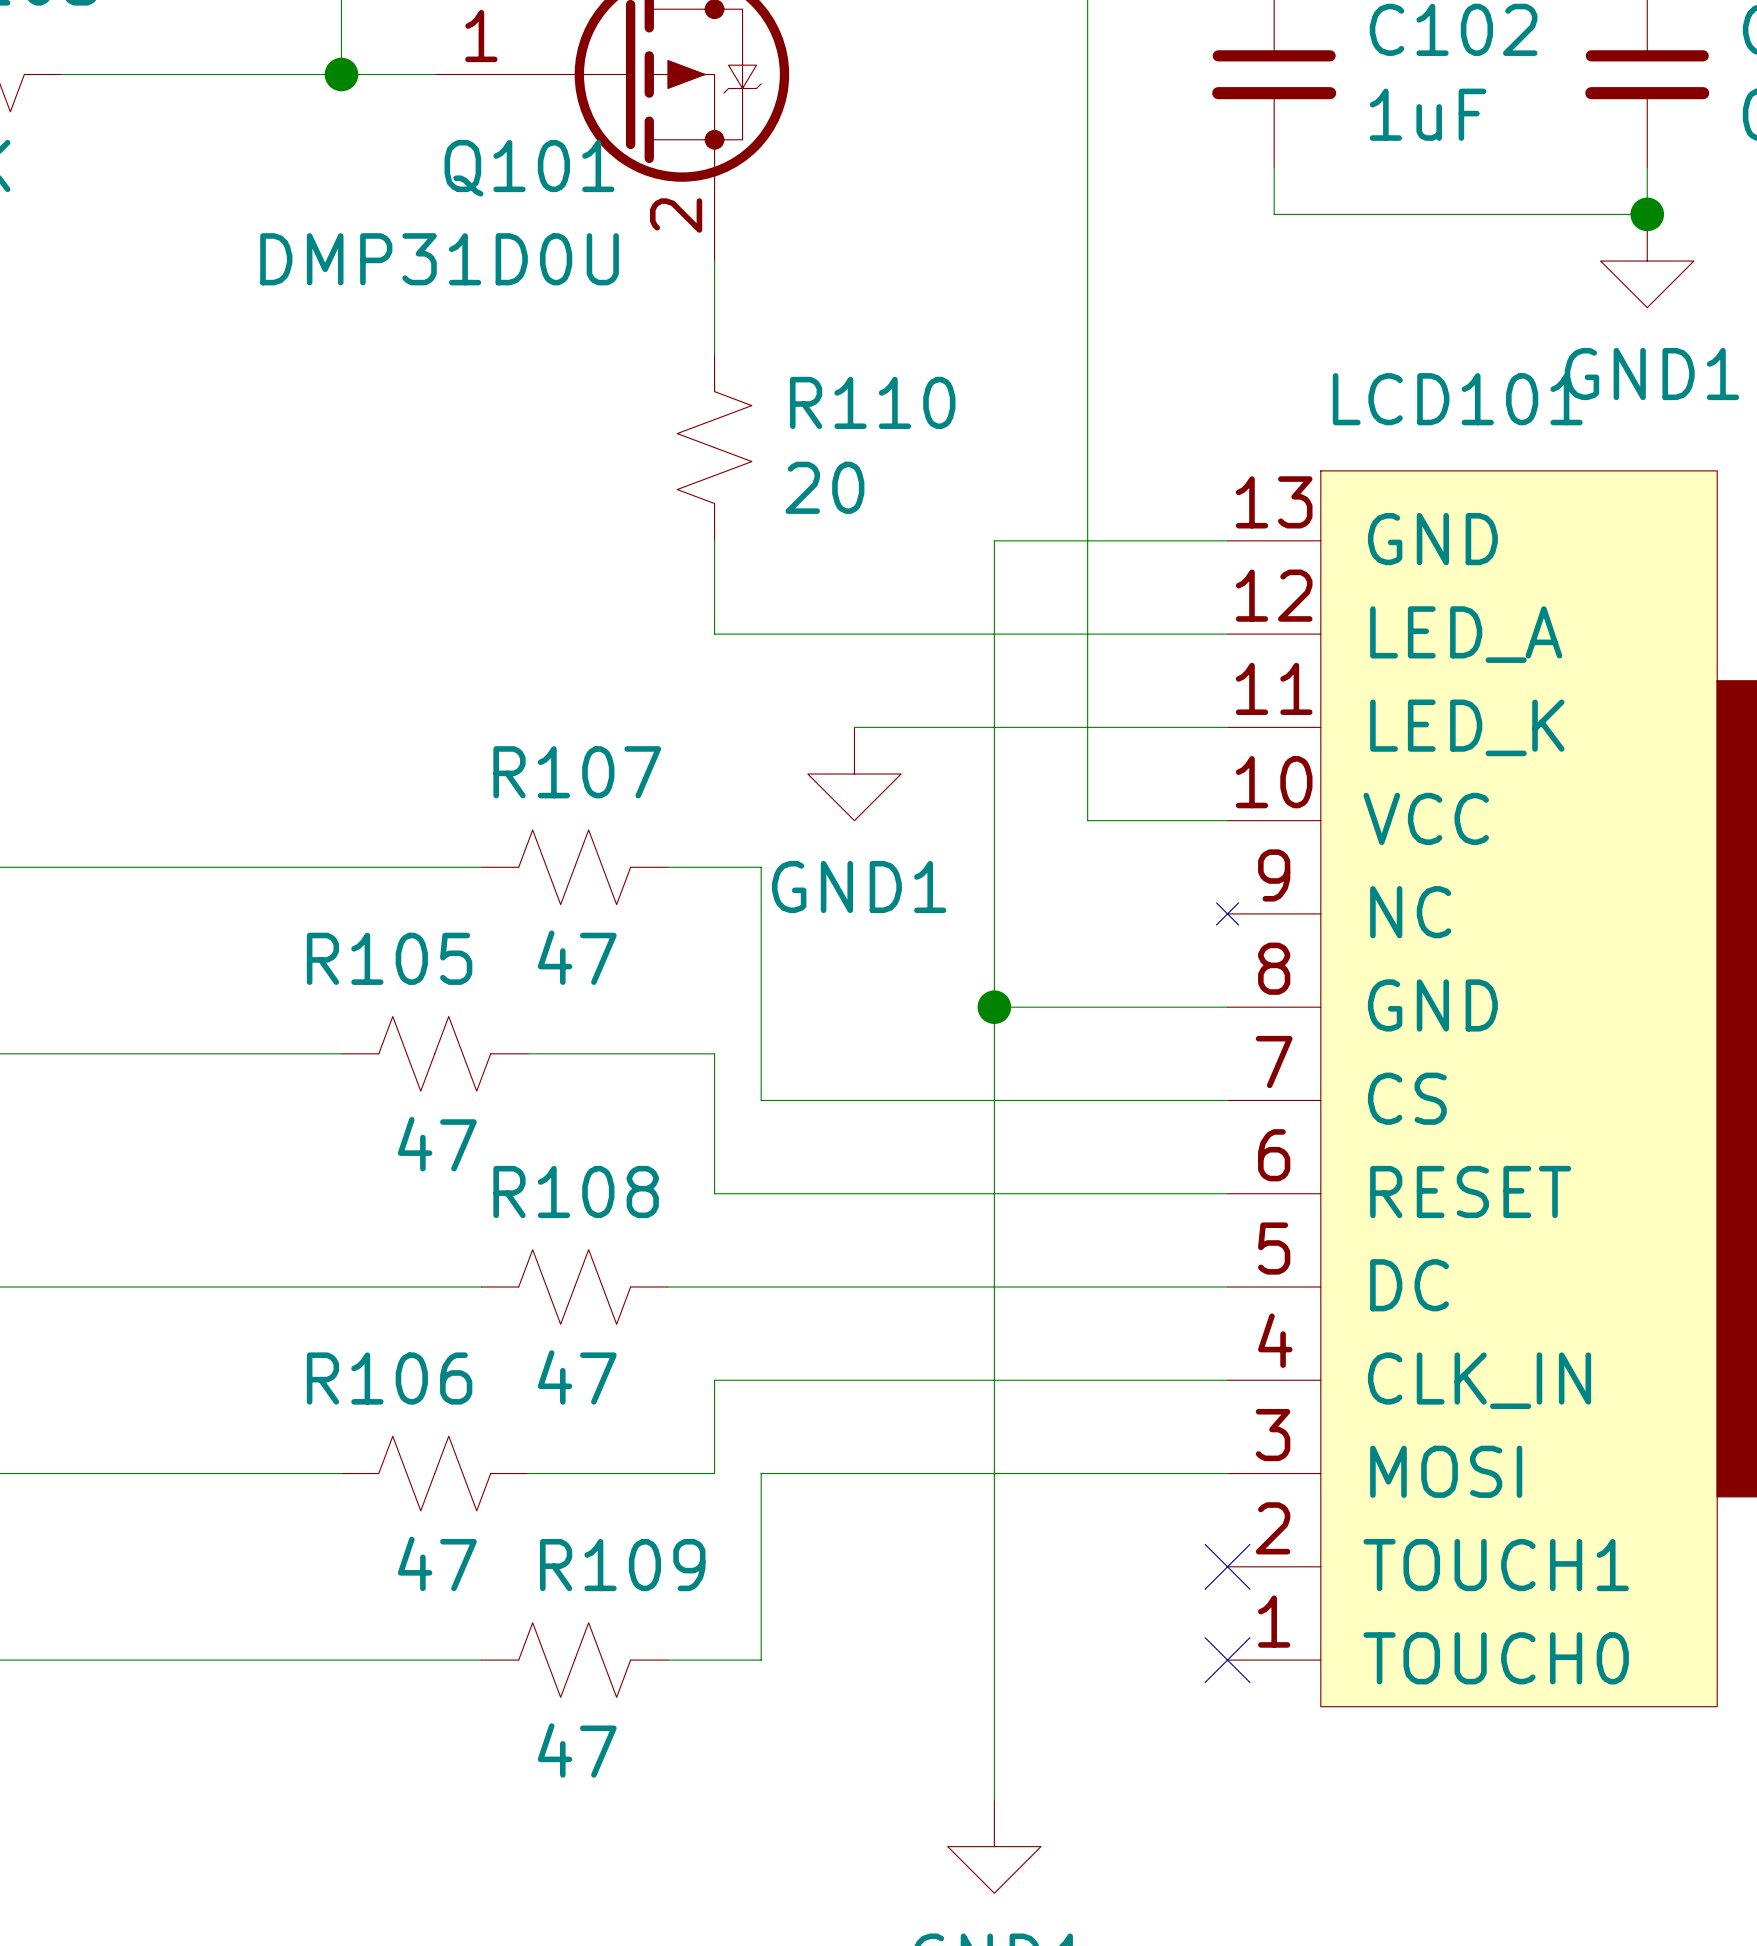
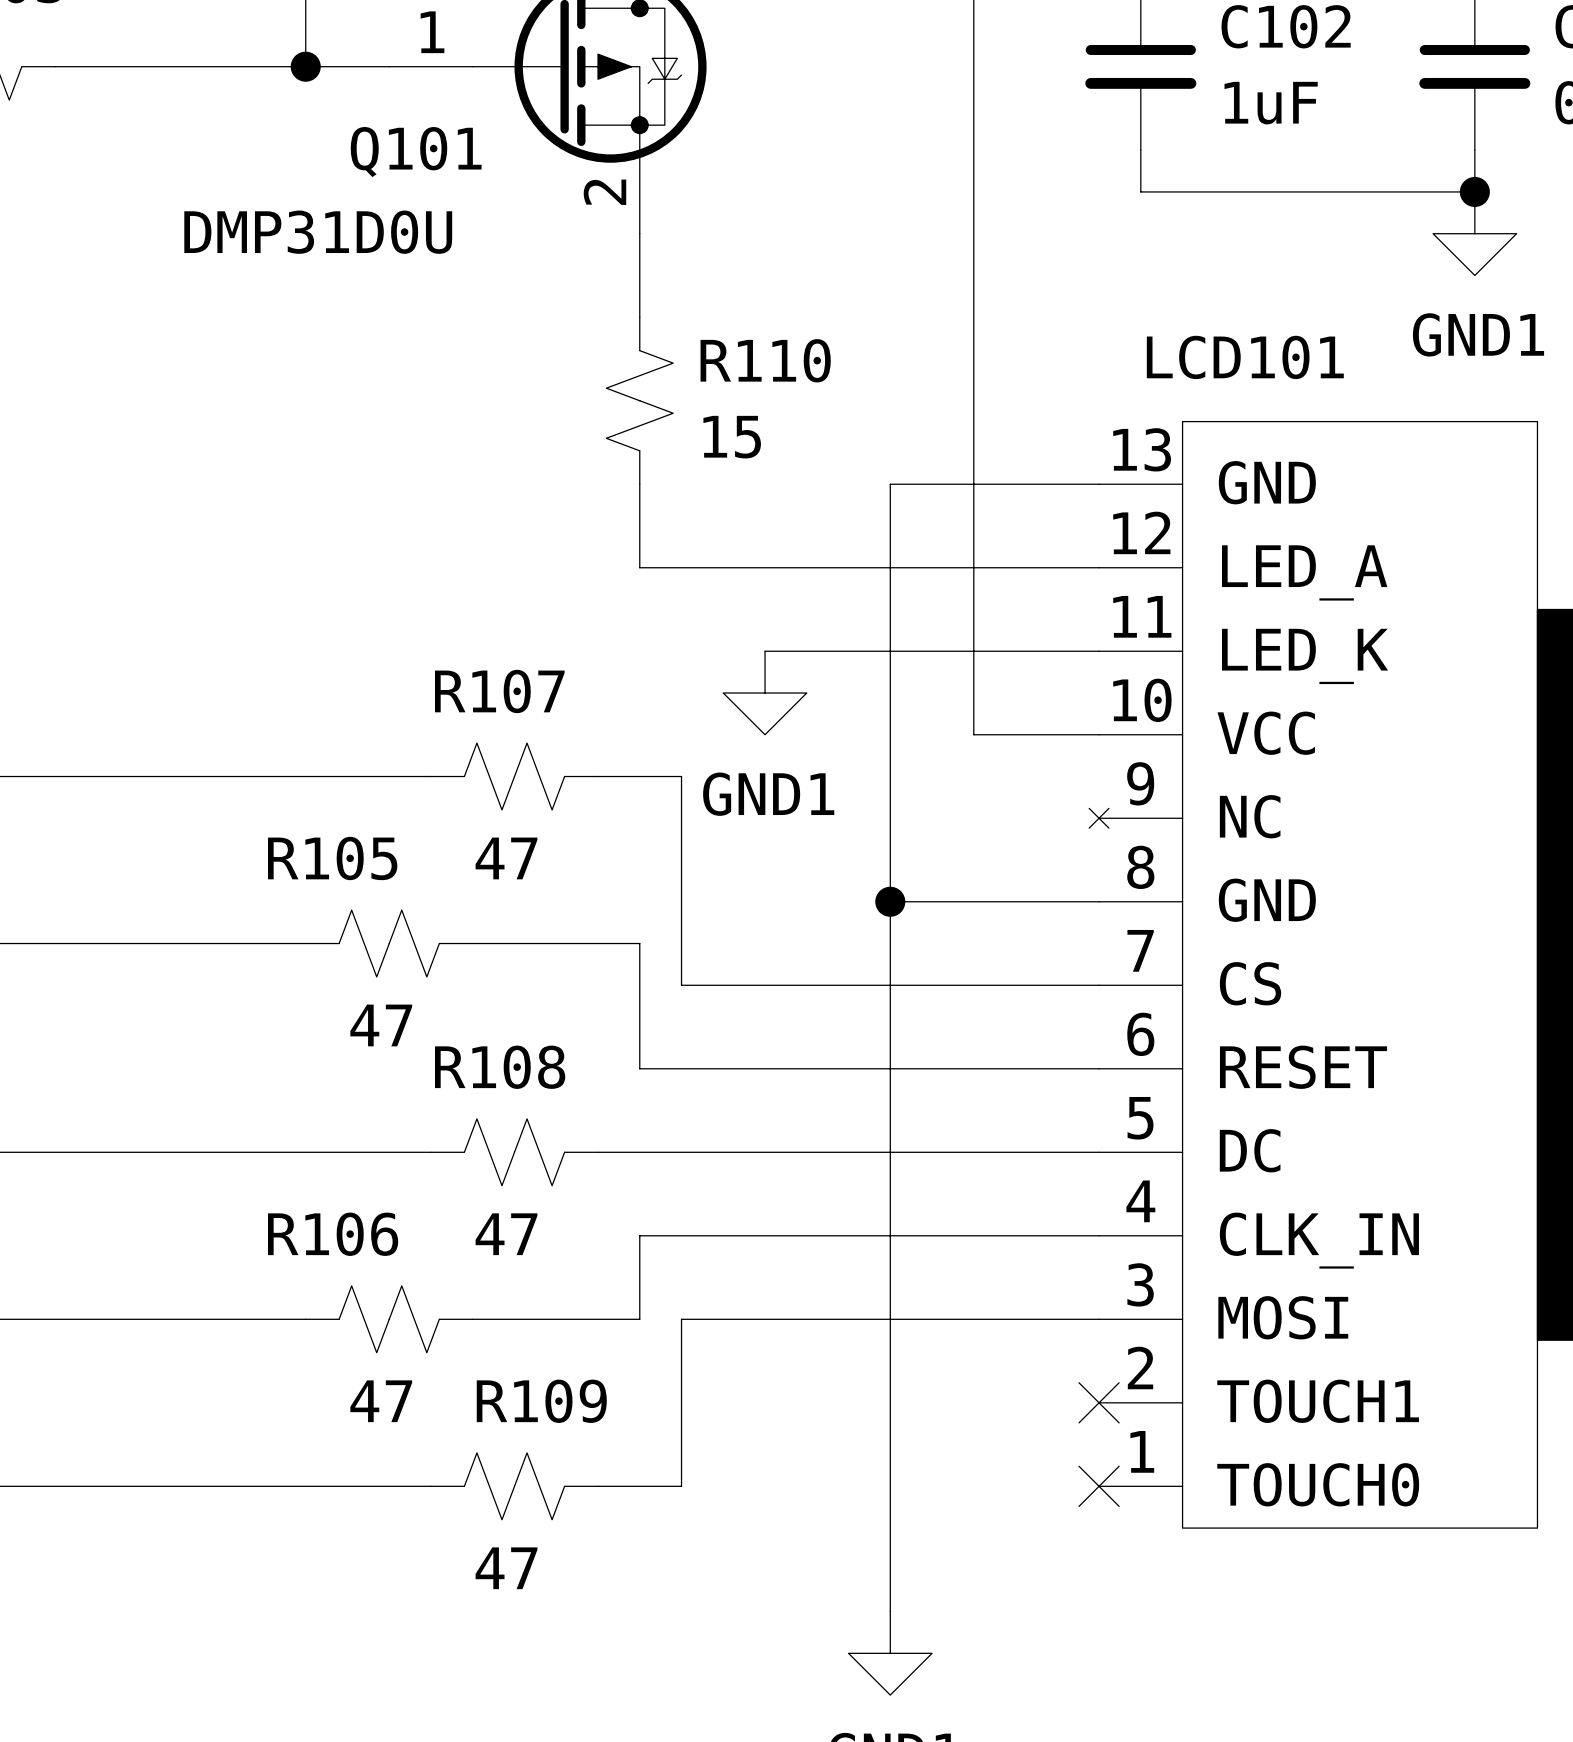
Q101 name position: Q101 (529, 168) -> Q101 (416, 152)
Q101 value position: DMP31D0U (439, 259) -> DMP31D0U (318, 232)
LCD101 name position: LCD101 (1457, 399) -> LCD101 (1245, 357)
R110 value: 20 (824, 487) -> 15 (732, 437)

